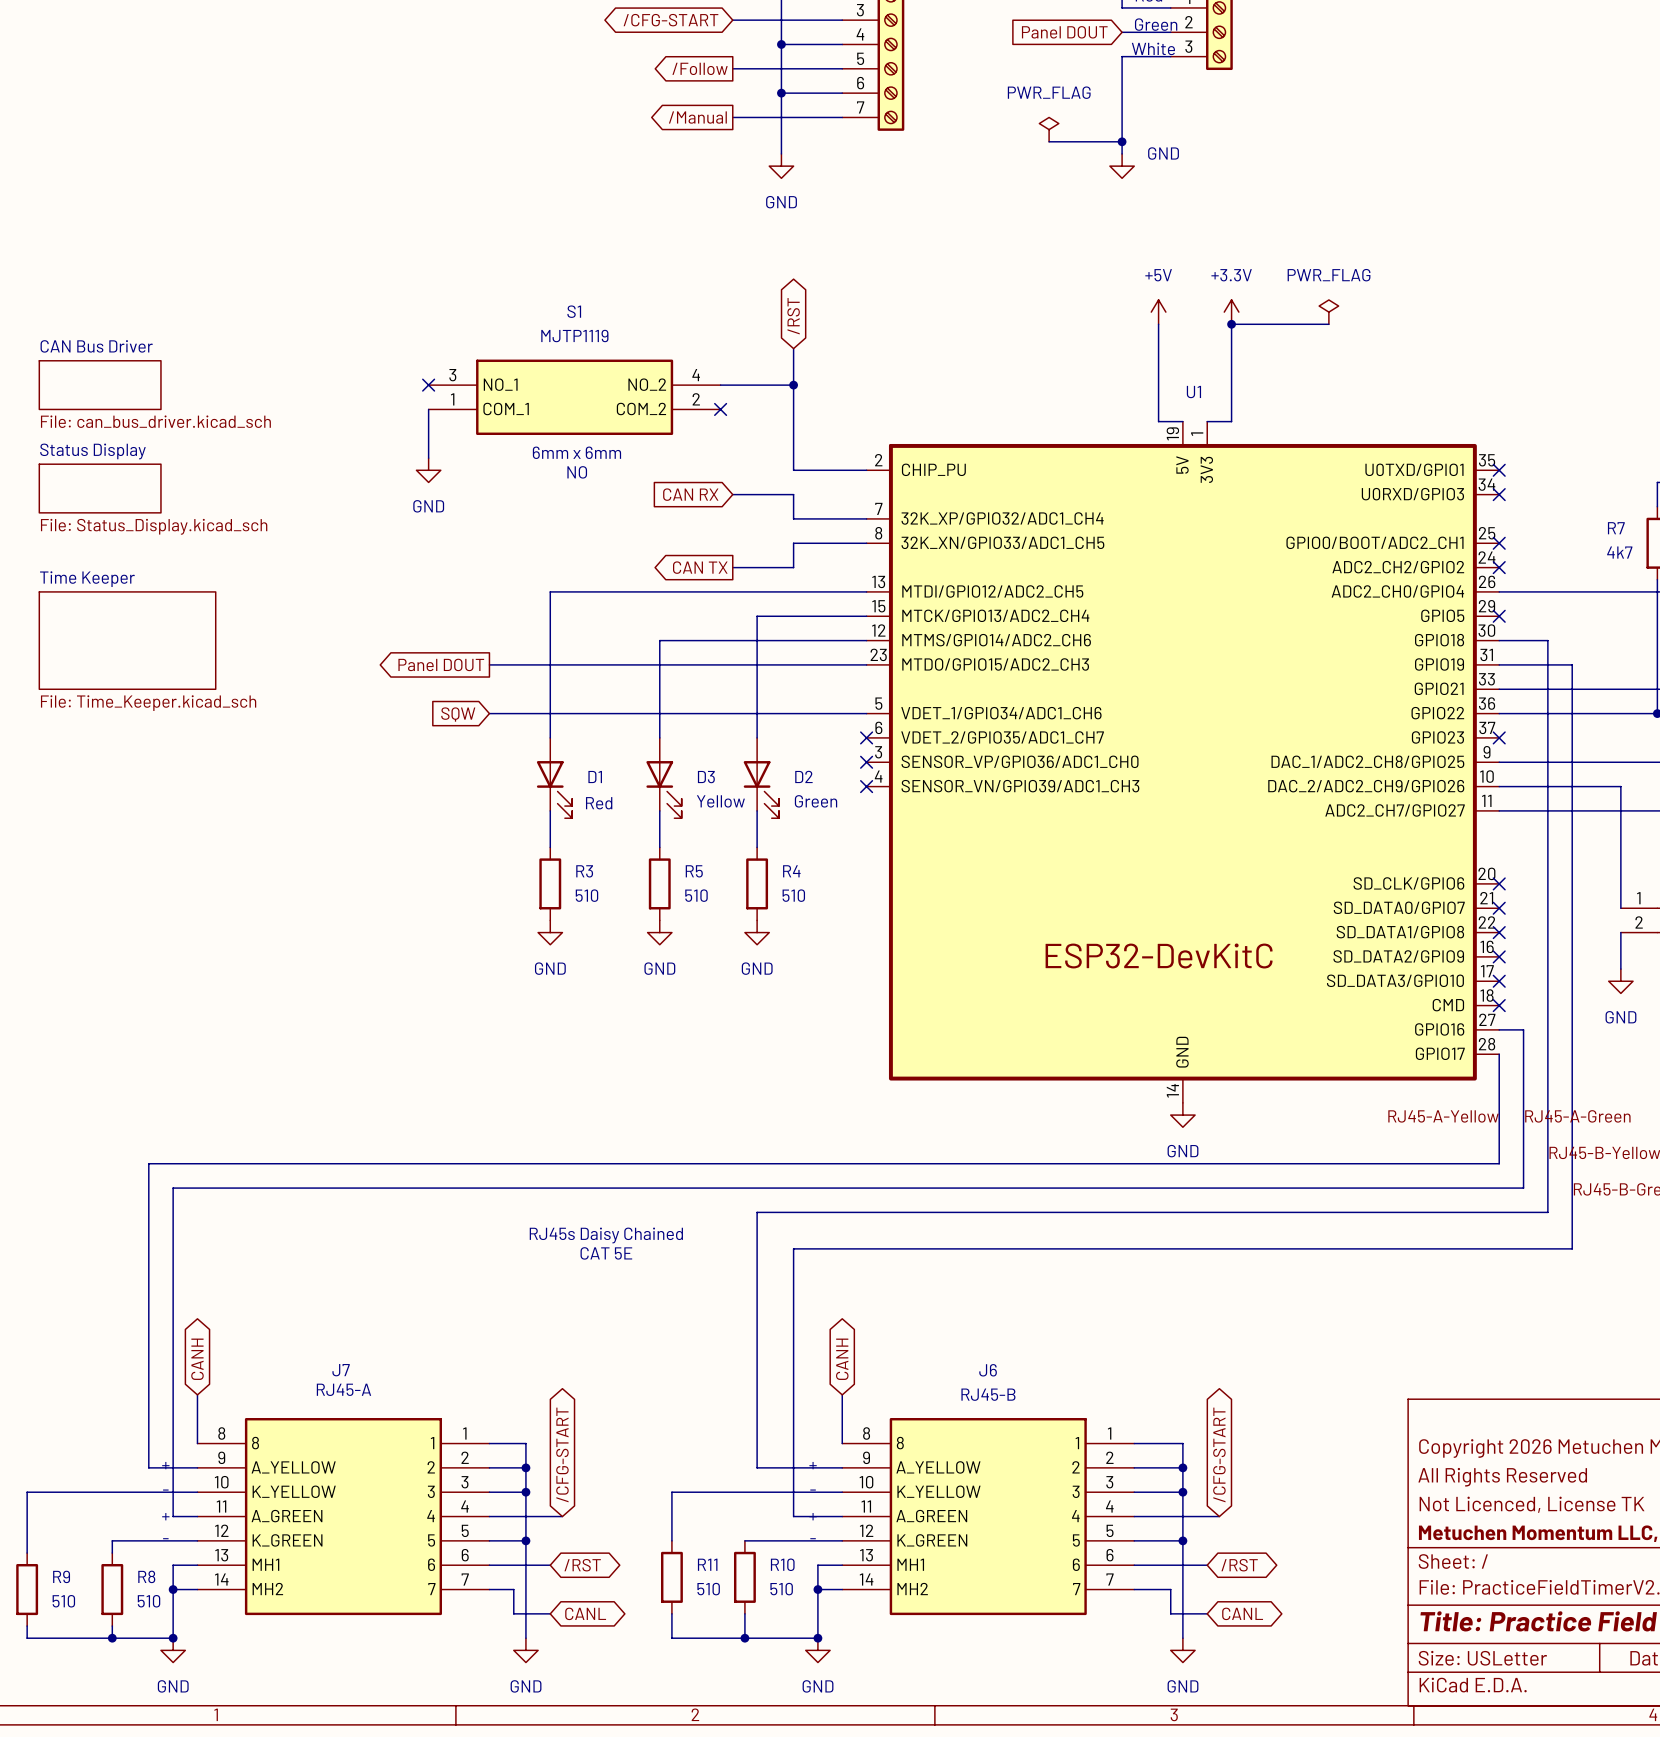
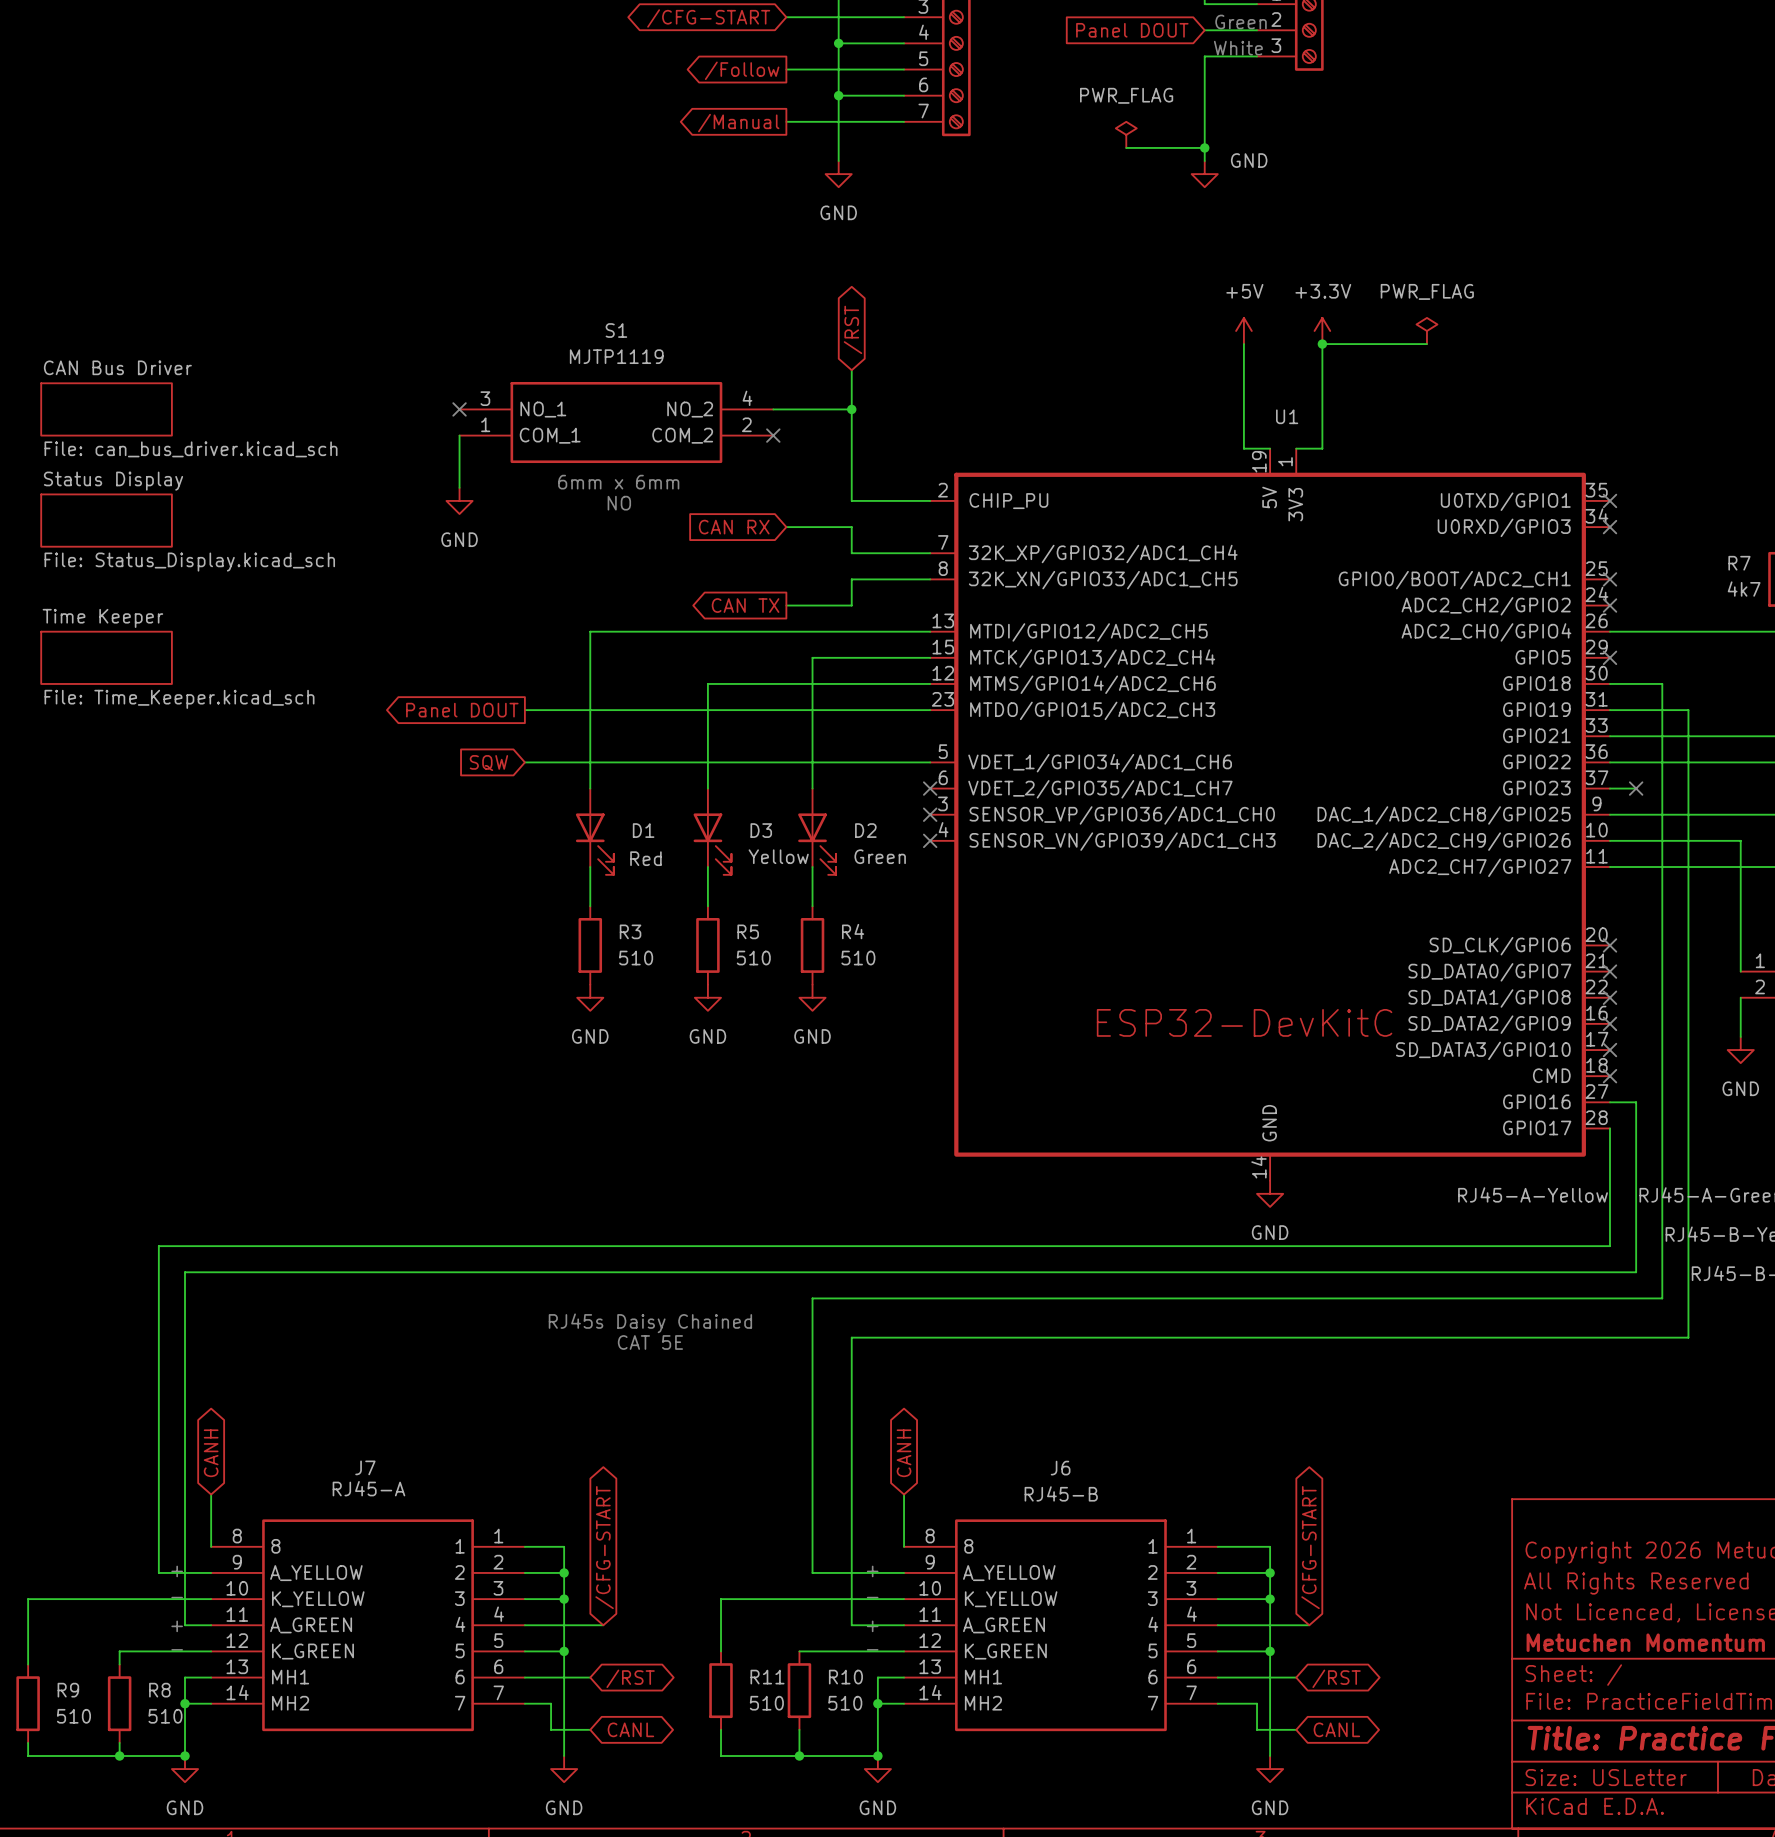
sheet Time Keeper: none -> File: Time_Keeper.kicad_sch (106, 657)
sheet Time Keeper: File: Time_Keeper.kicad_sch (127, 640) -> none
wire: none -> (1610, 788) (1636, 788)
no-connect mark position: (1499, 737) -> (1636, 788)

